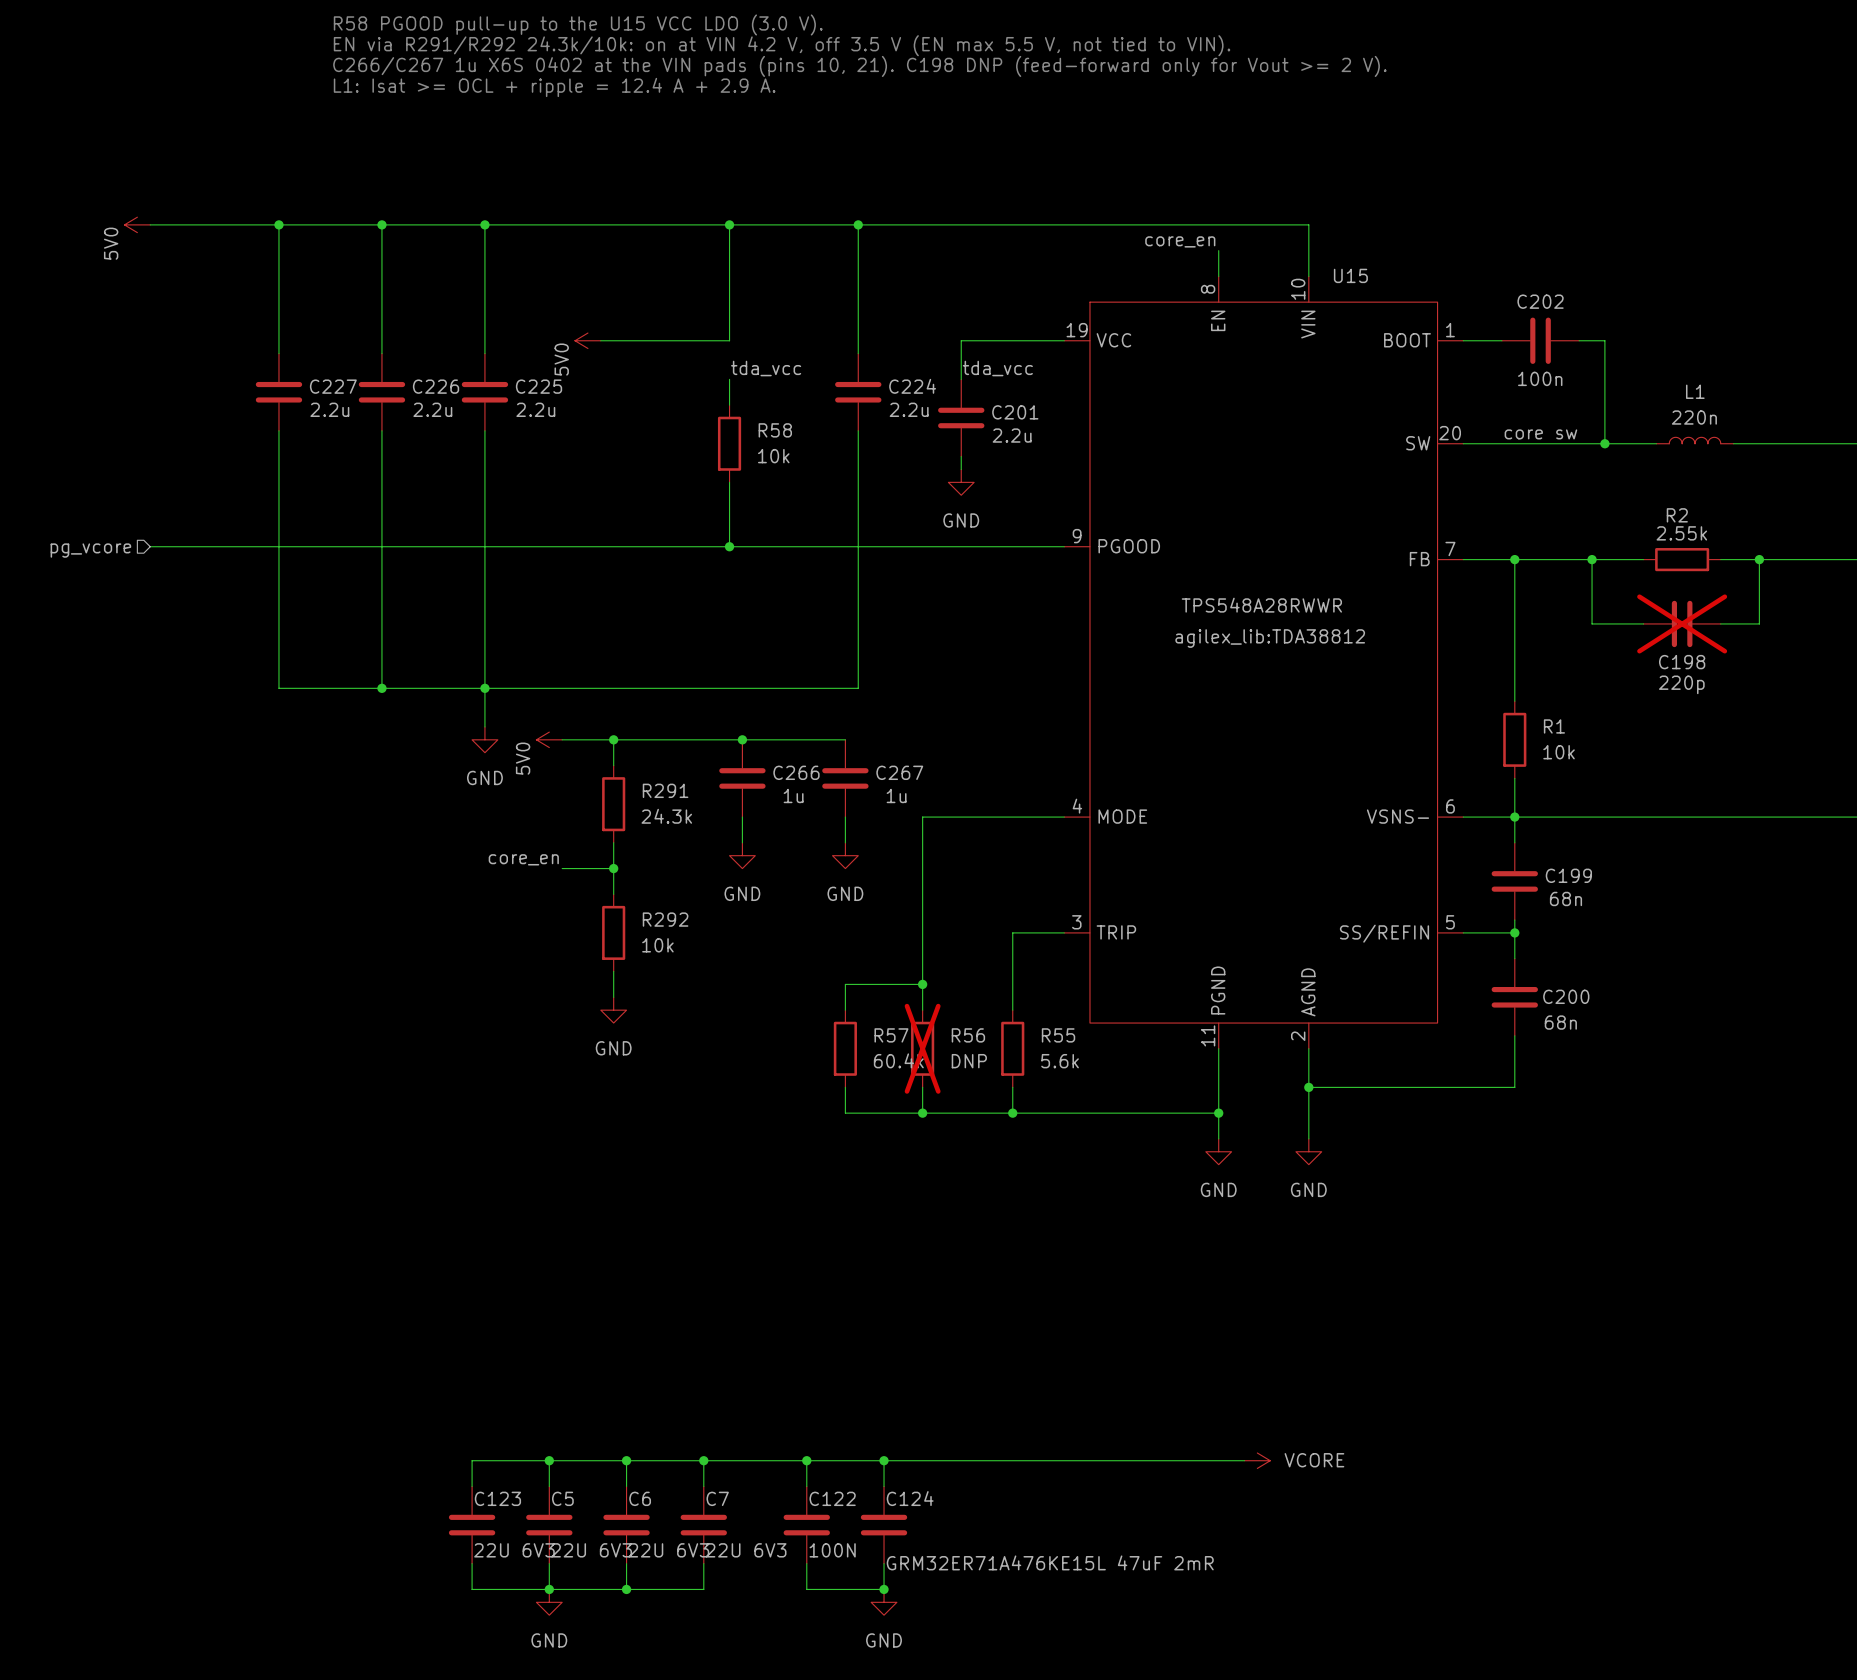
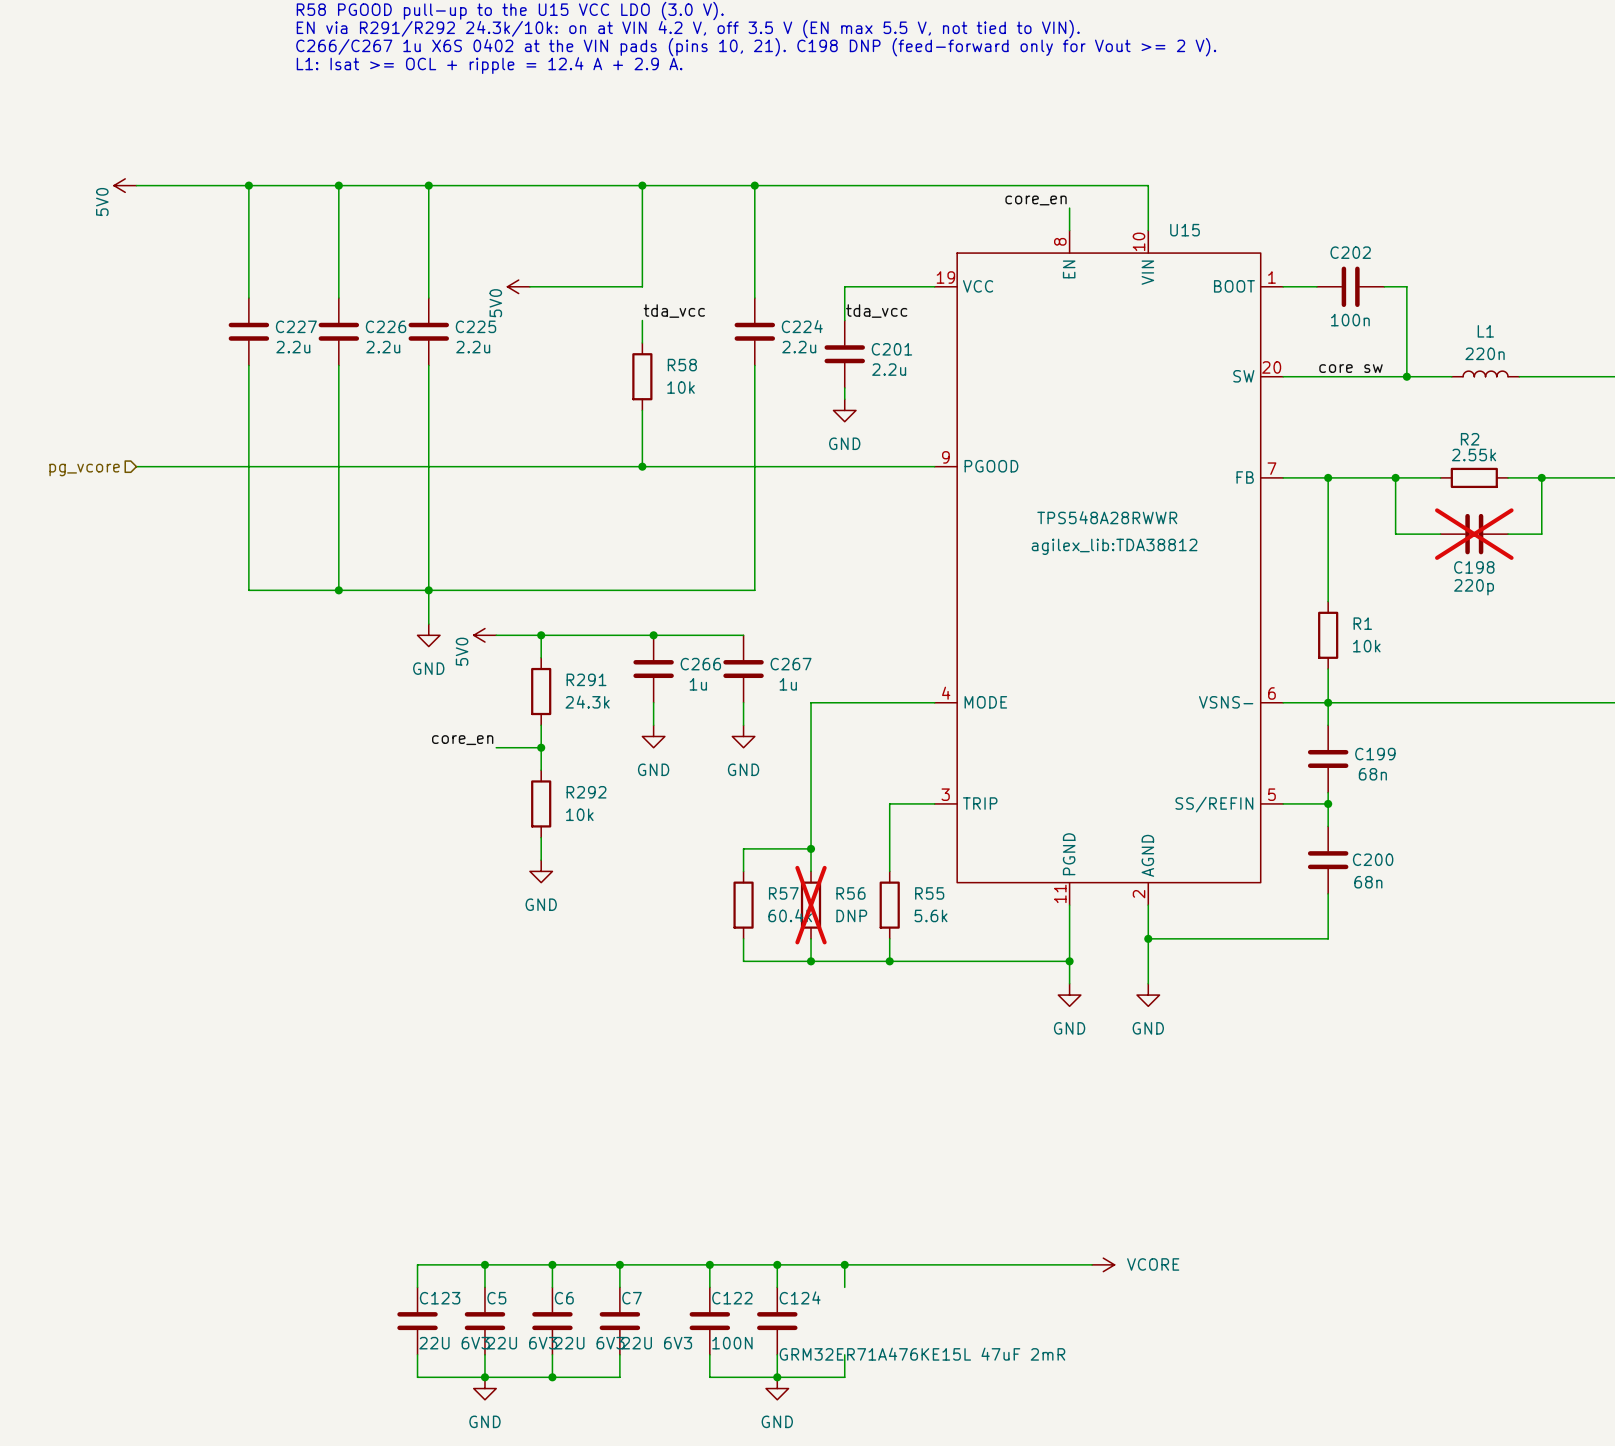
wire: none -> (844, 1264) (844, 1287)
junction: none -> (844, 1264)
wire: none -> (844, 1354) (844, 1377) (777, 1377)

